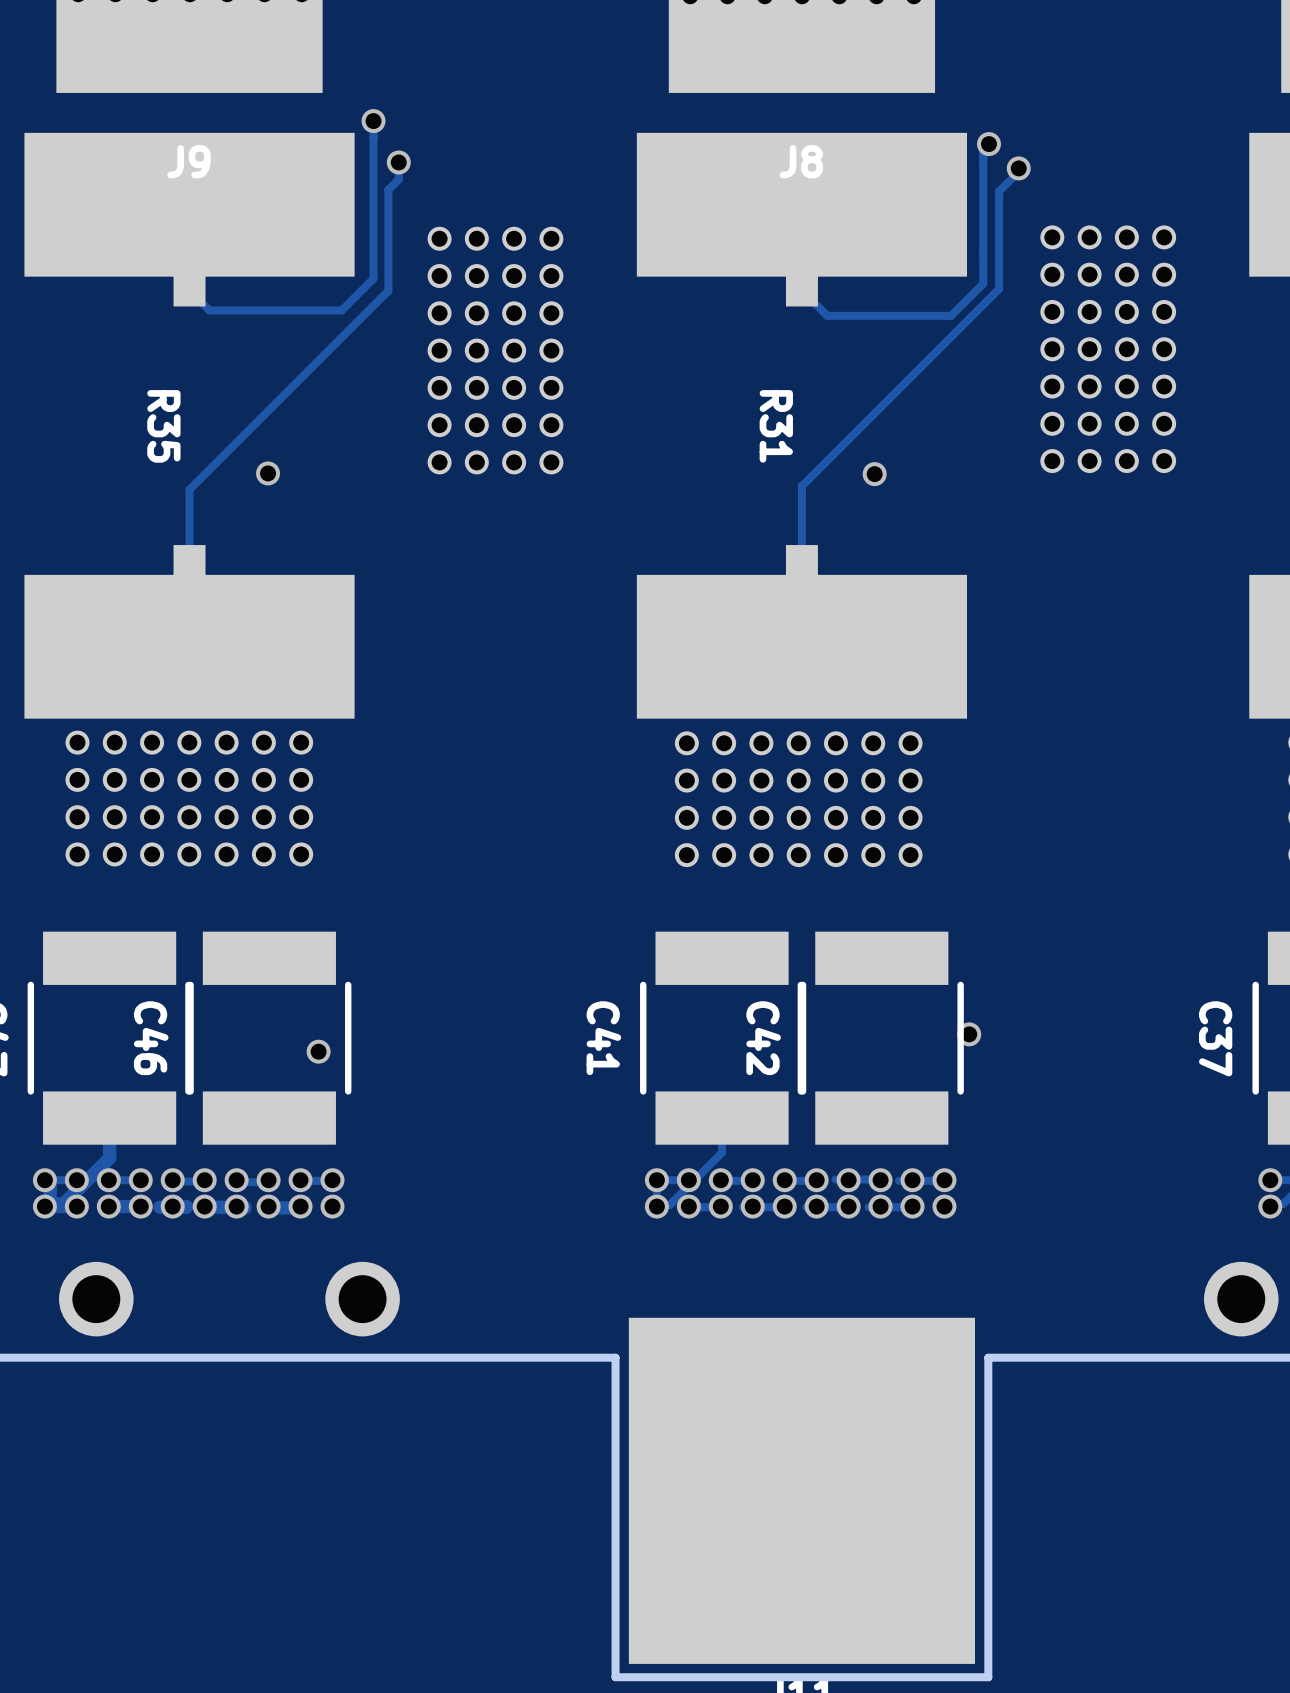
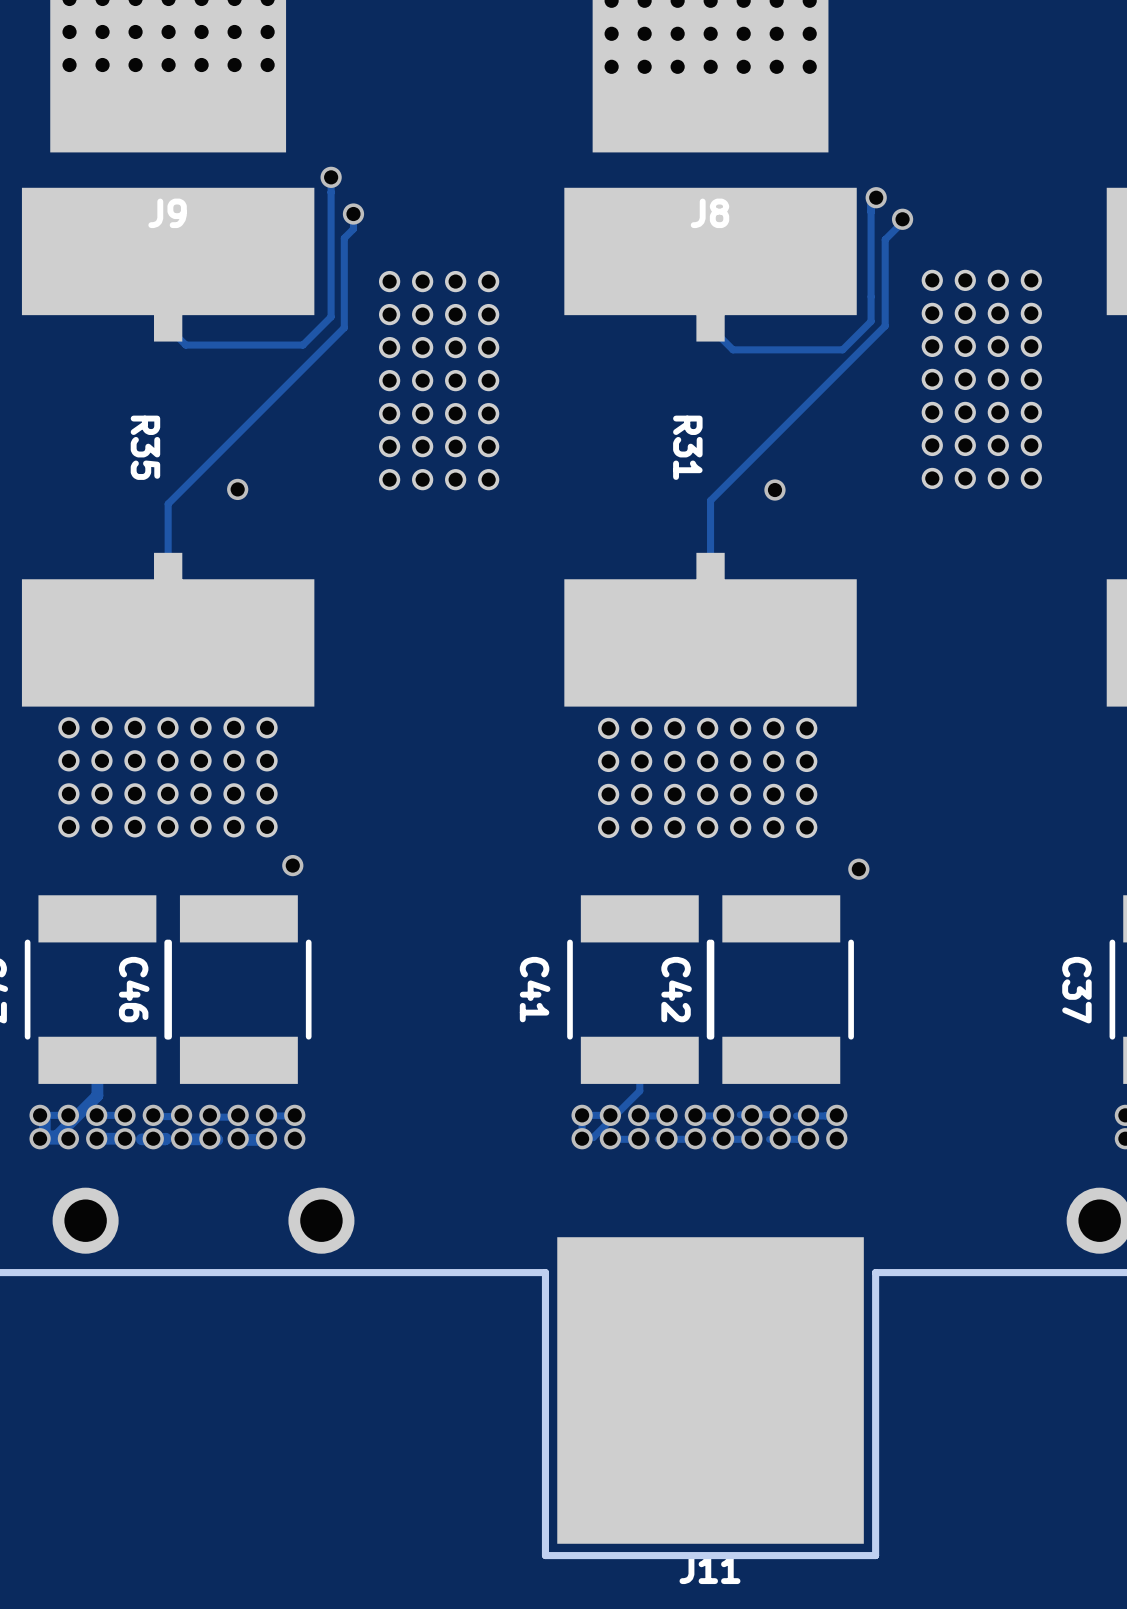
via position: (969, 1034) -> (858, 869)
via position: (318, 1051) -> (292, 865)

